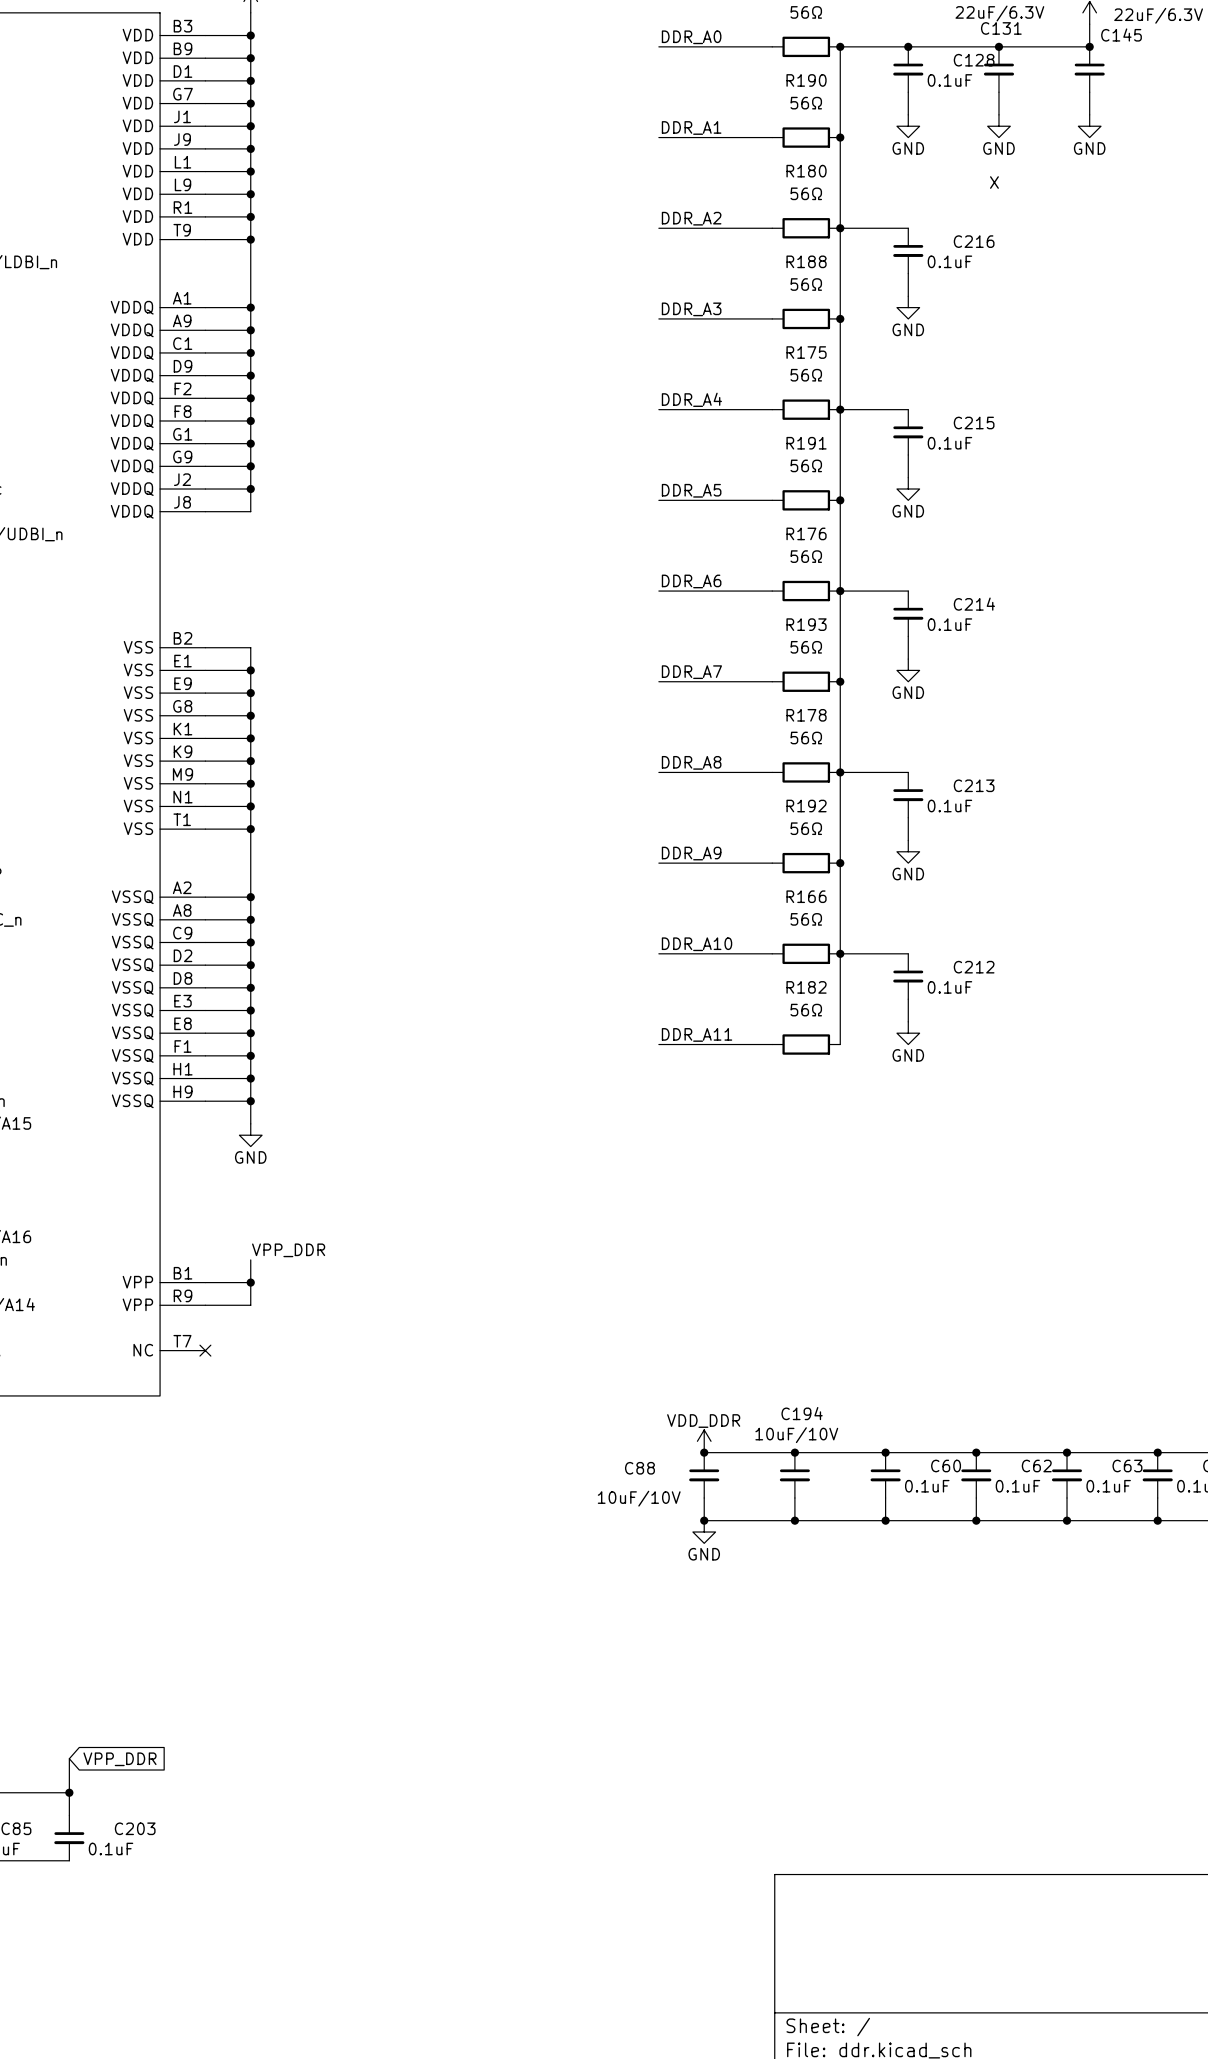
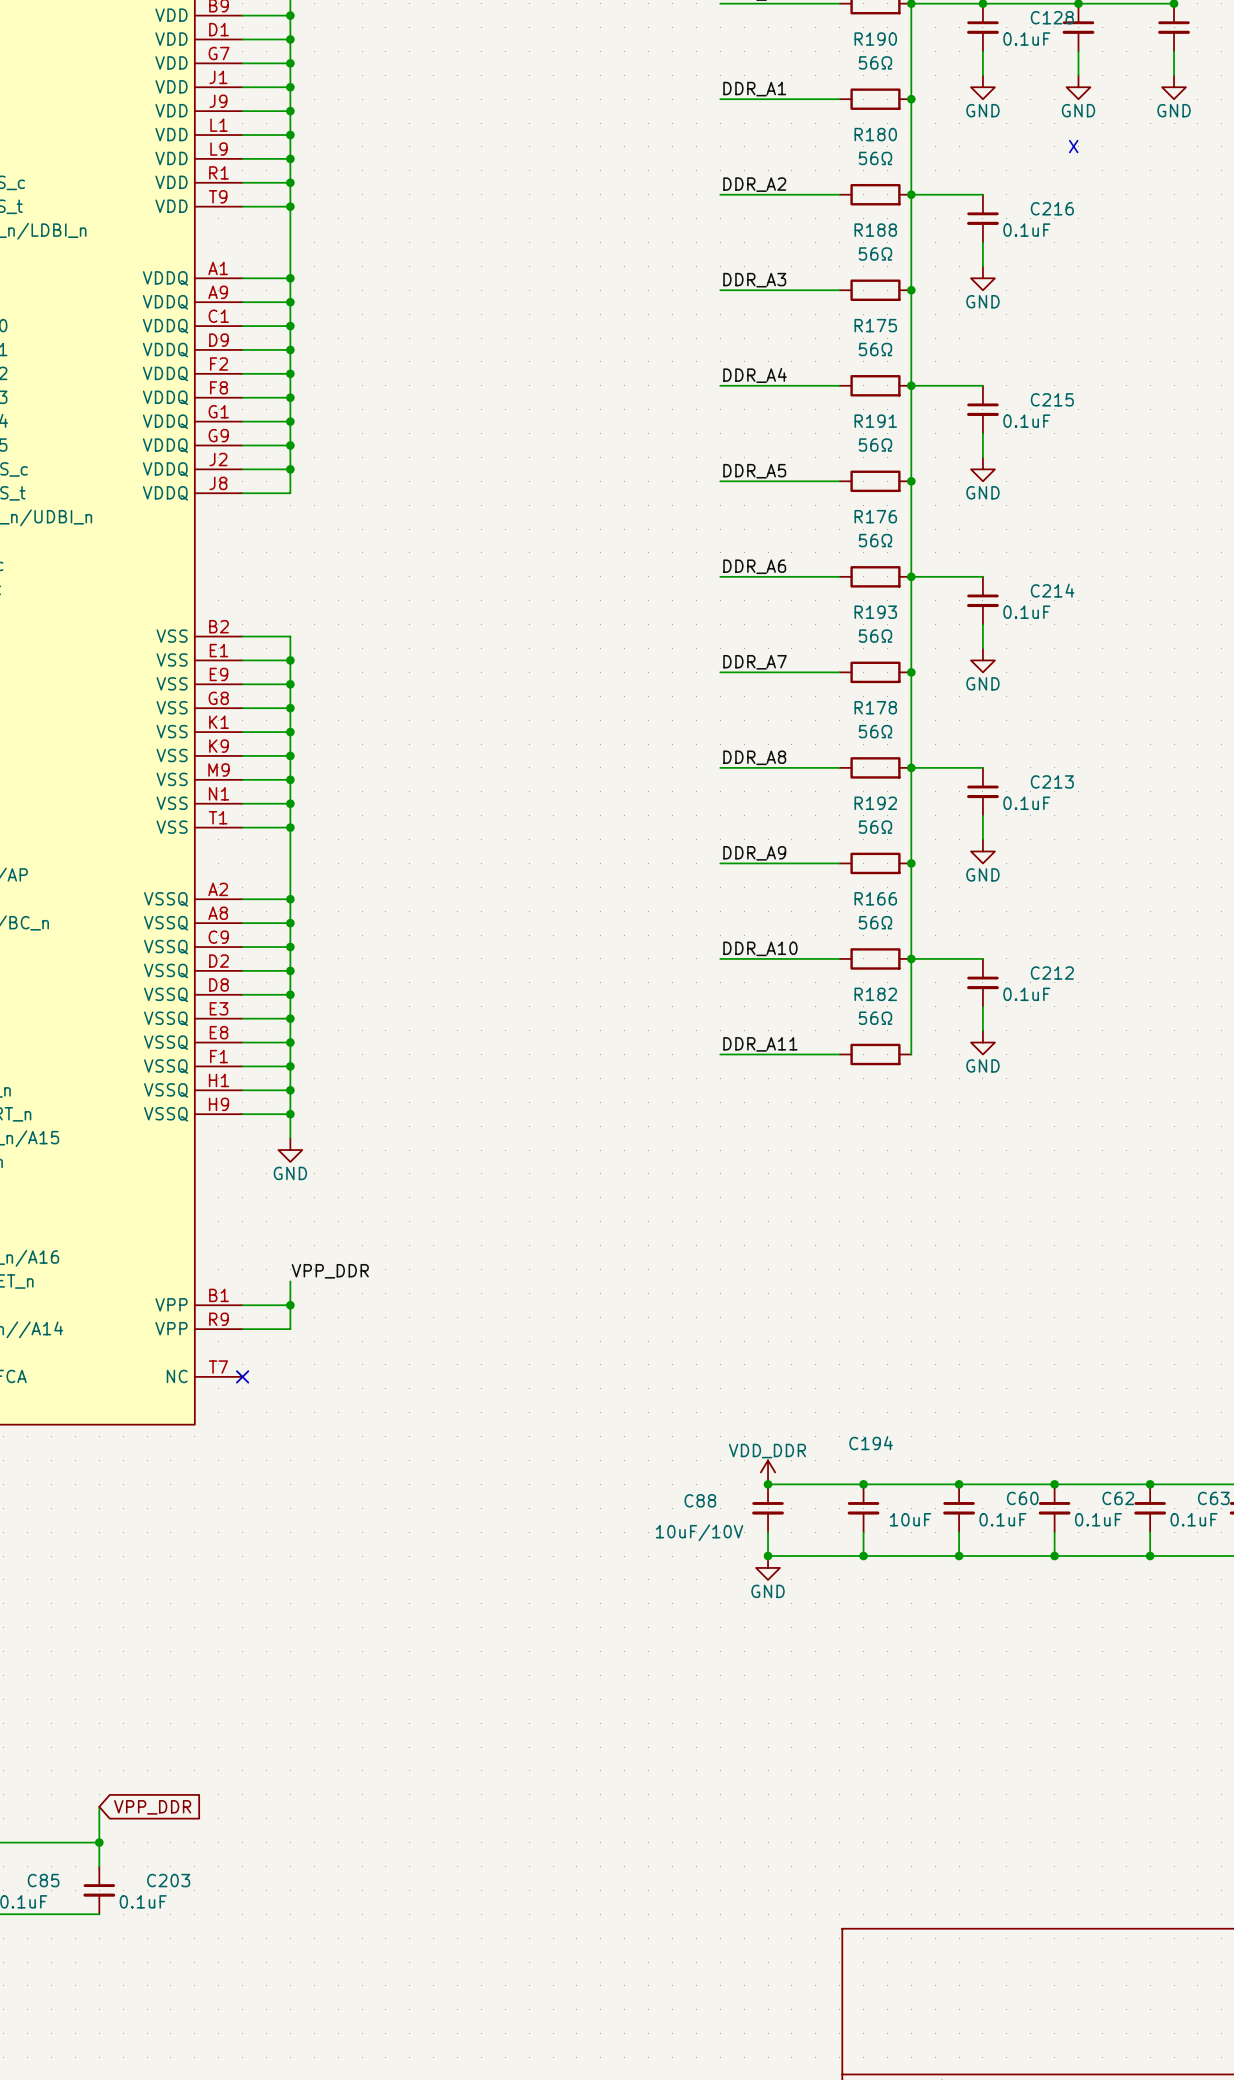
C194 text: 10uF/10V (796, 1435) -> 10uF (910, 1519)

